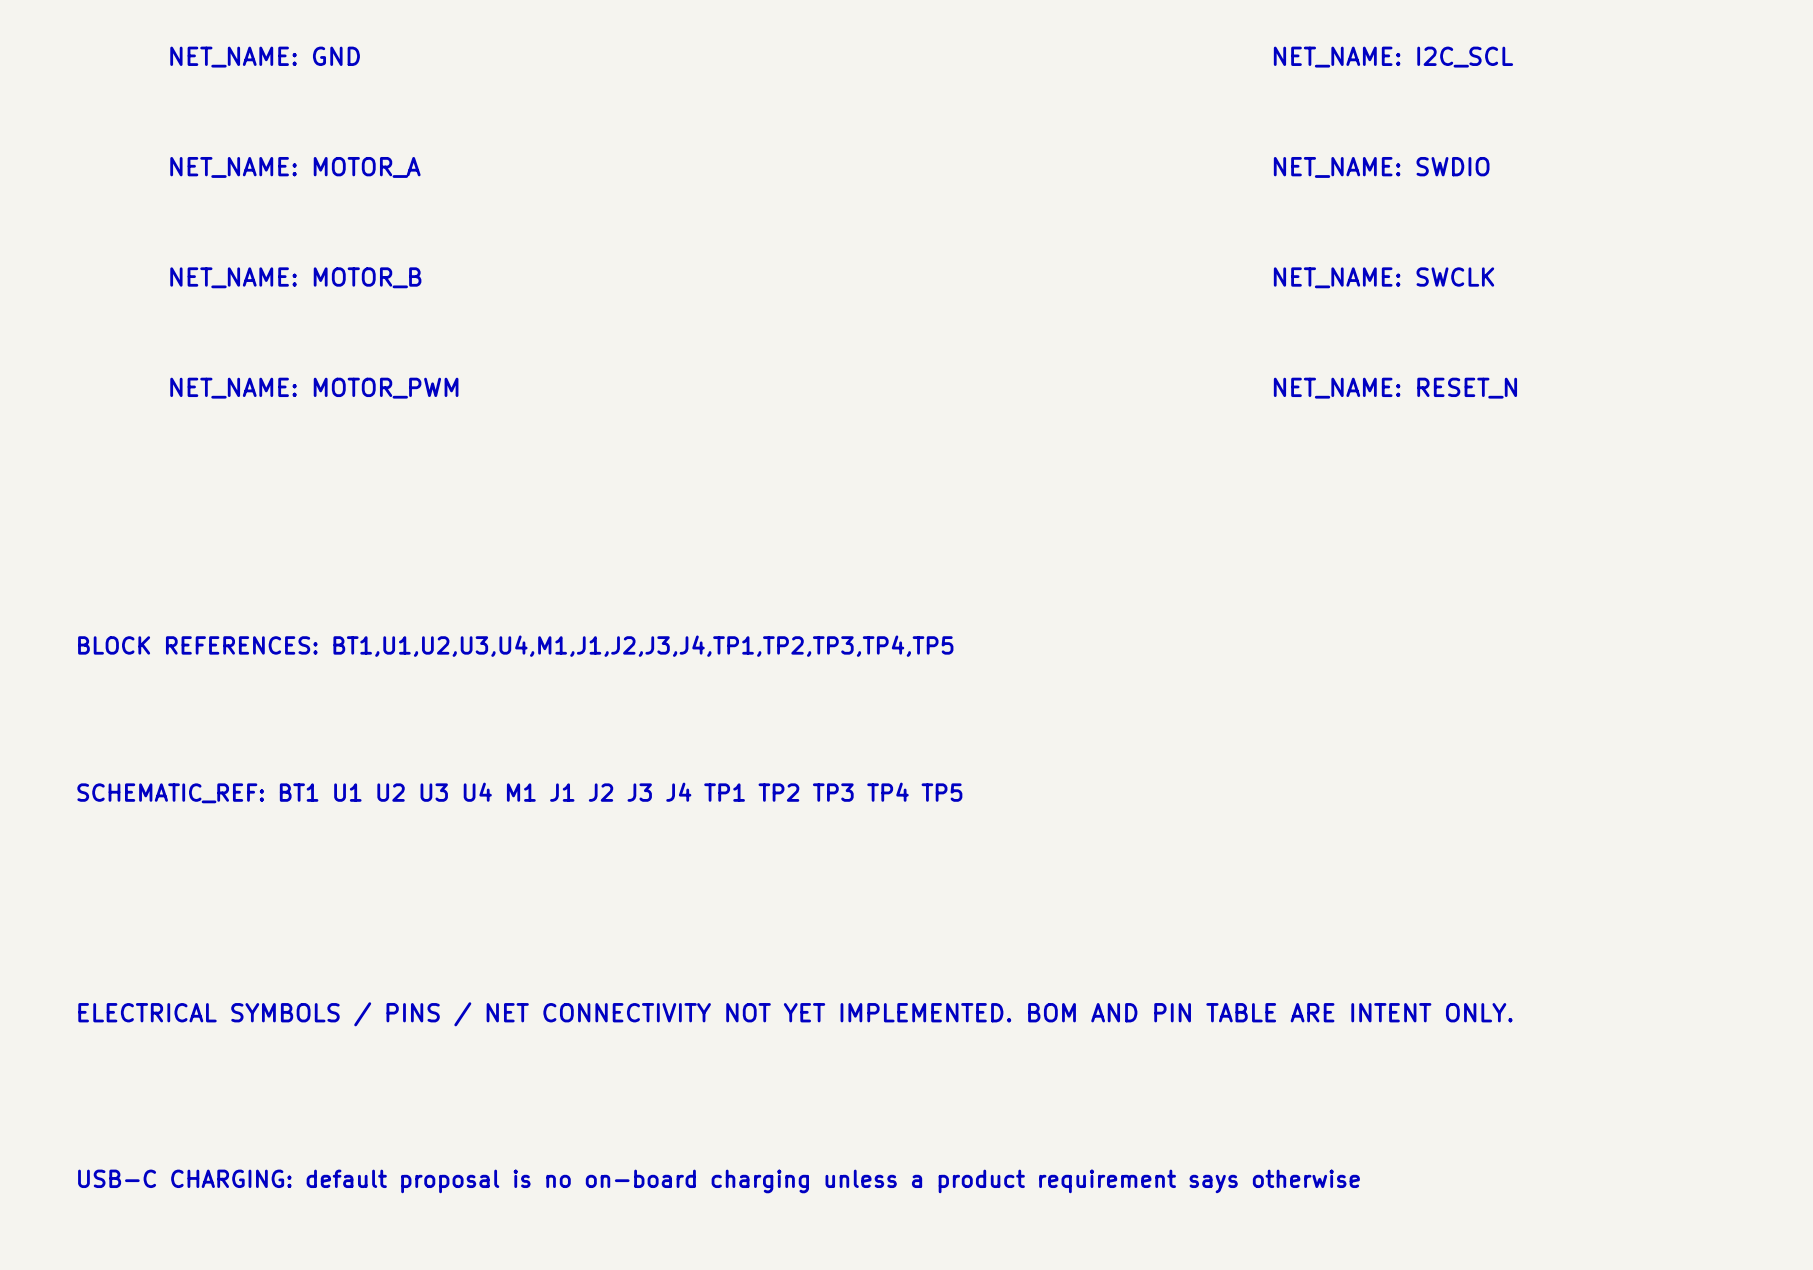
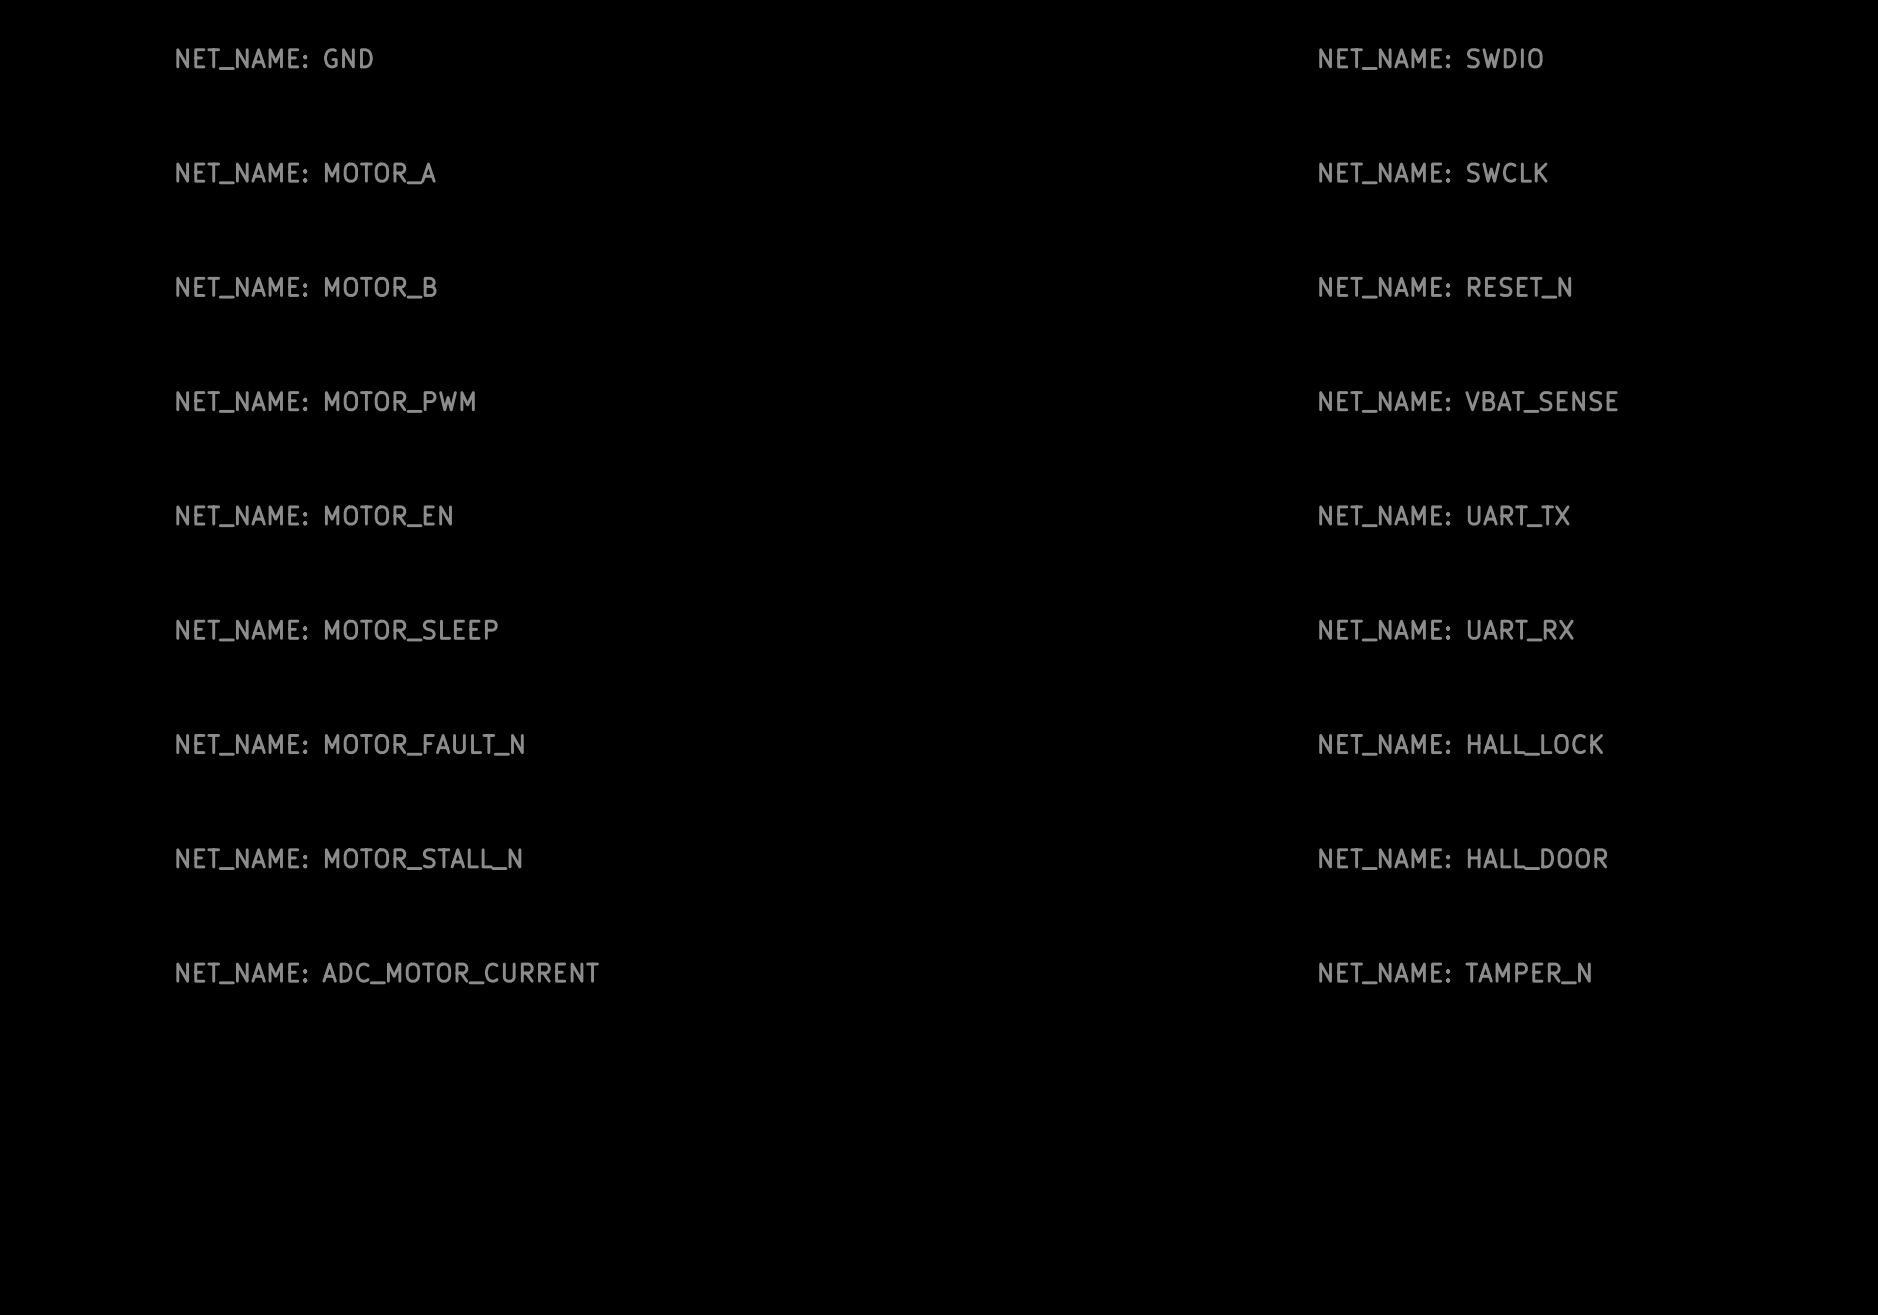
text: NET_NAME: I2C_SCL (1393, 57) -> NET_NAME: SWDIO (1430, 59)
text: NET_NAME: SWDIO (1381, 167) -> NET_NAME: SWCLK (1433, 173)
text: NET_NAME: SWCLK (1384, 277) -> NET_NAME: RESET_N (1445, 287)
text: NET_NAME: RESET_N (1395, 388) -> NET_NAME: VBAT_SENSE (1468, 401)
text: none -> NET_NAME: MOTOR_EN (314, 516)
text: none -> NET_NAME: UART_TX (1444, 516)
text: none -> NET_NAME: MOTOR_SLEEP (336, 630)
text: none -> NET_NAME: UART_RX (1446, 630)
text: BLOCK REFERENCES: BT1,U1,U2,U3,U4,M1,J1,J2,J3,J4,TP1,TP2,TP3,TP4,TP5 (515, 646) -> none
text: none -> NET_NAME: MOTOR_FAULT_N (350, 744)
text: none -> NET_NAME: HALL_LOCK (1461, 744)
text: SCHEMATIC_REF: BT1 U1 U2 U3 U4 M1 J1 J2 J3 J4 TP1 TP2 TP3 TP4 TP5 (519, 792) -> none
text: none -> NET_NAME: MOTOR_STALL_N (348, 859)
text: none -> NET_NAME: HALL_DOOR (1463, 859)
text: none -> NET_NAME: ADC_MOTOR_CURRENT (387, 973)
text: none -> NET_NAME: TAMPER_N (1454, 973)
text: ELECTRICAL SYMBOLS / PINS / NET CONNECTIVITY NOT YET IMPLEMENTED. BOM AND PIN TABLE ARE INTENT ONLY. (795, 1014) -> none
text: USB-C CHARGING: default proposal is no on-board charging unless a product requirement says otherwise (718, 1181) -> none

